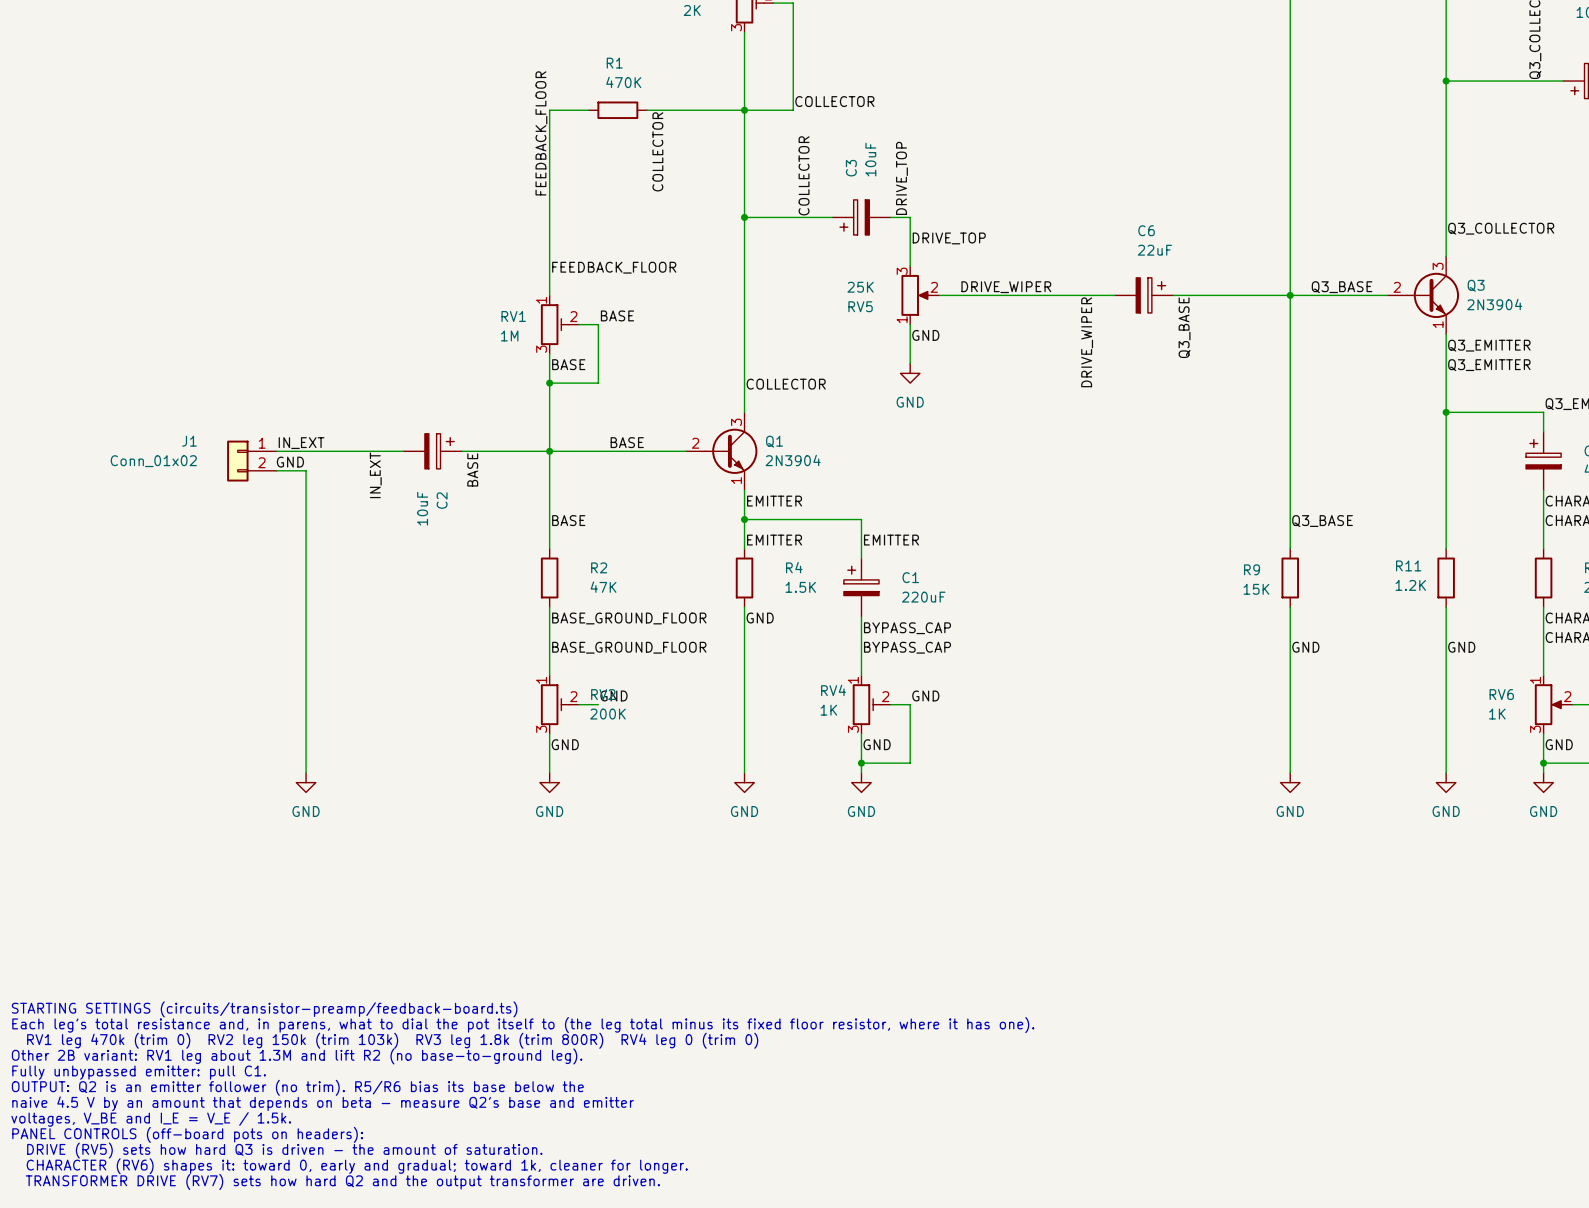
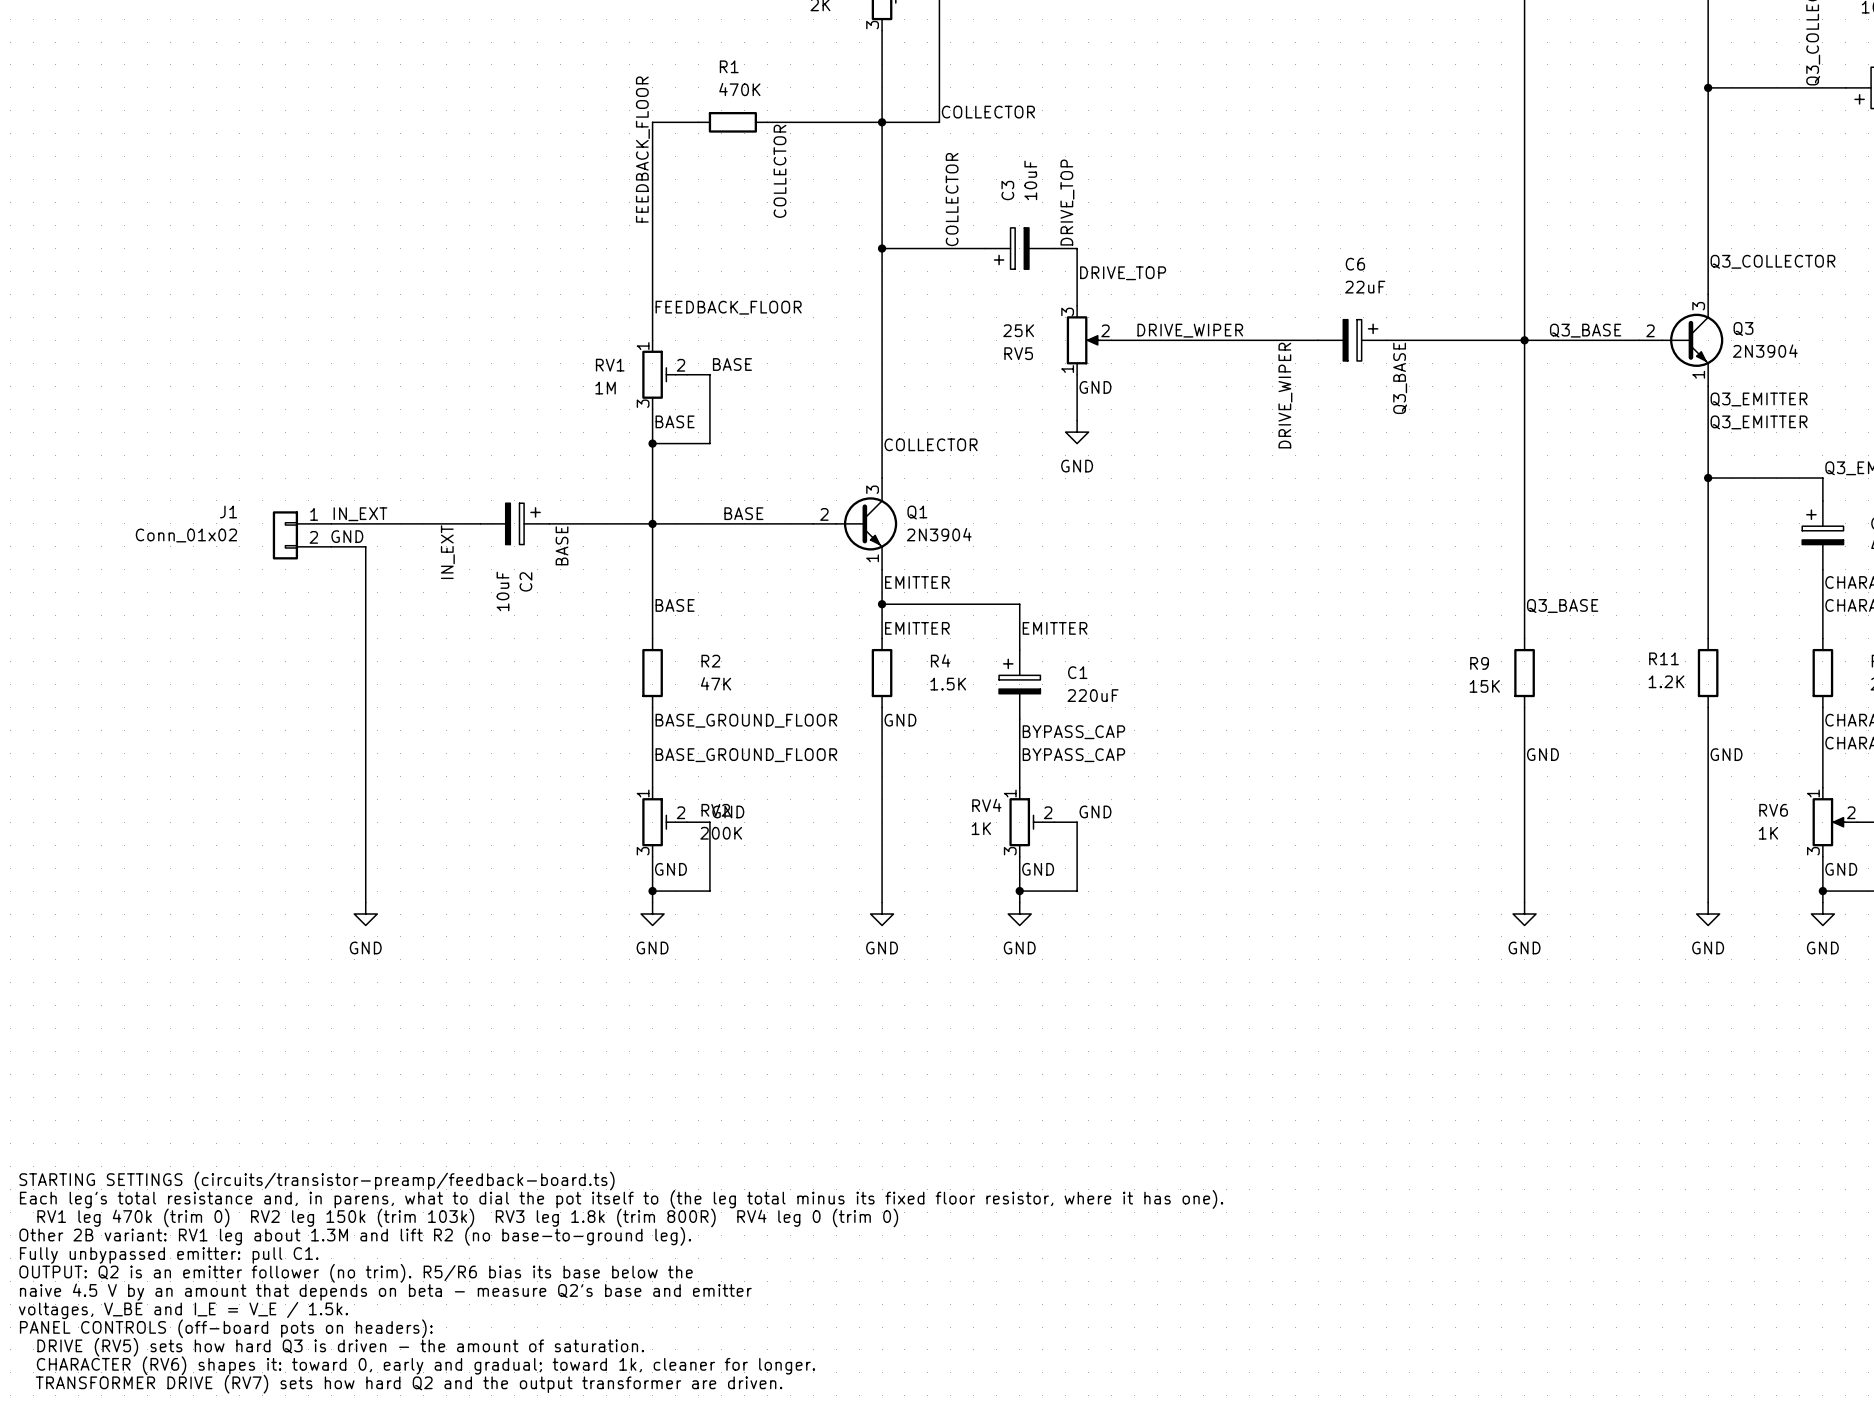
wire: none -> (709, 822) (709, 891) (652, 891)
junction: none -> (652, 891)

